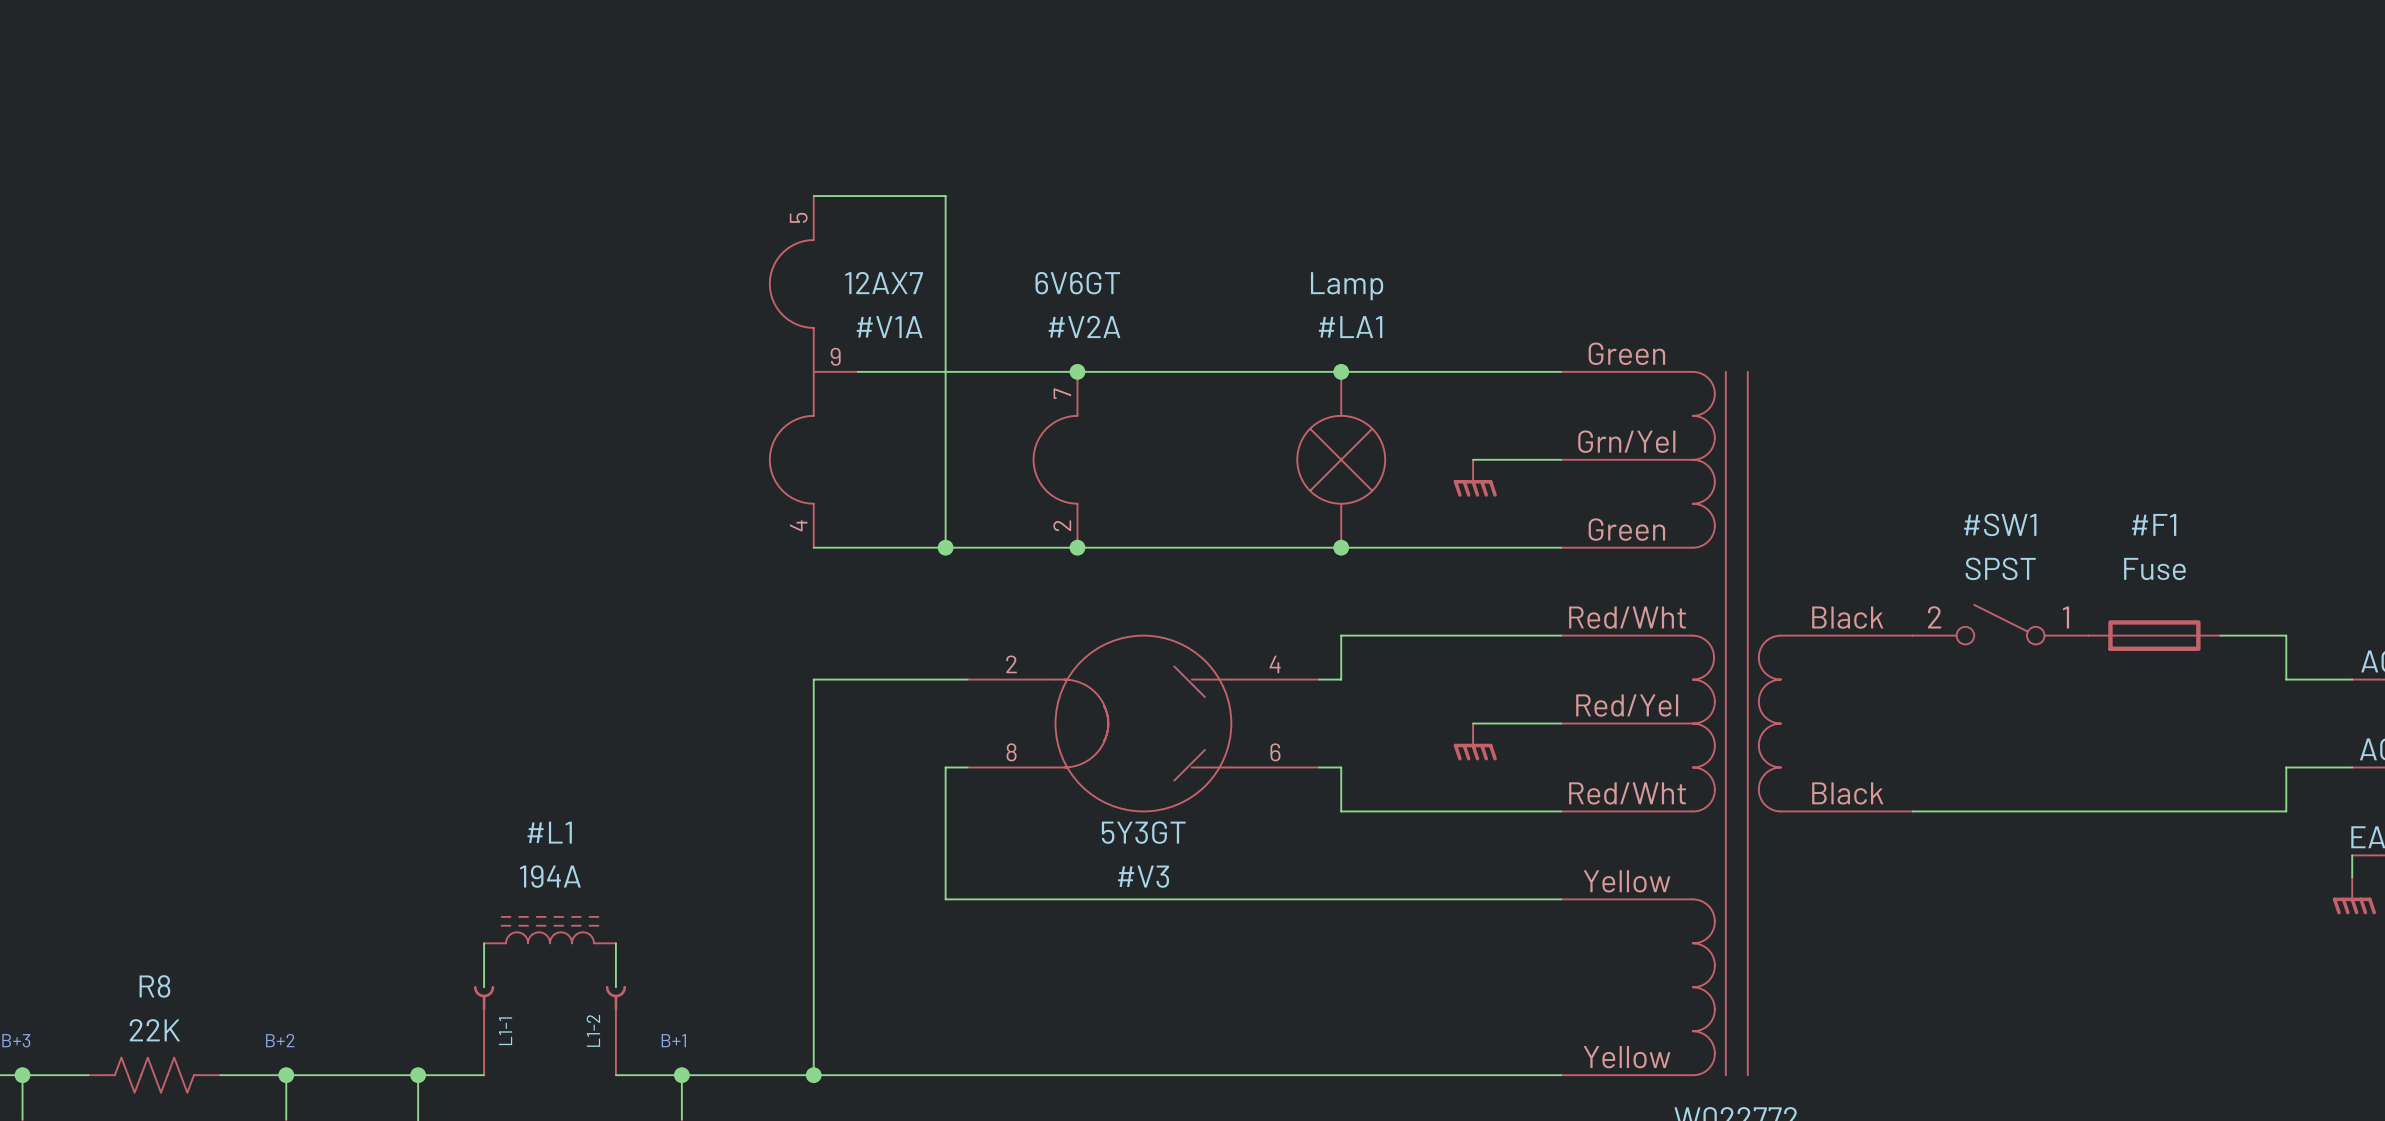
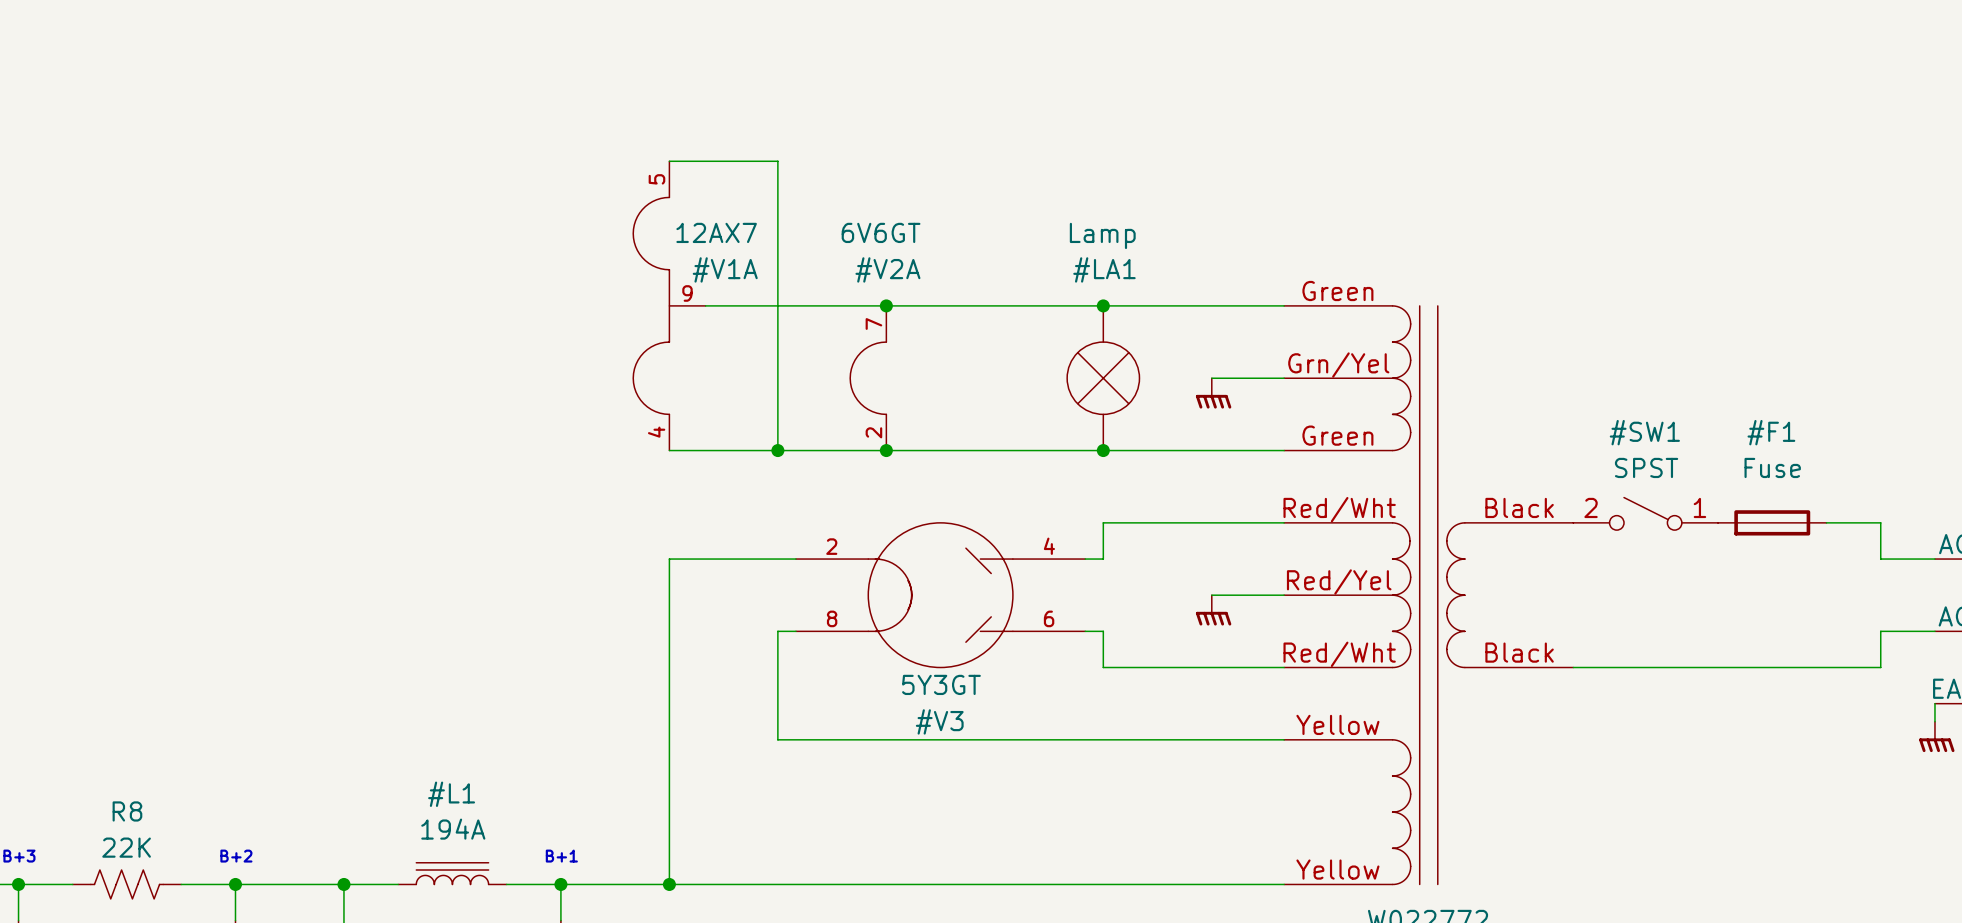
#L1 shape: [484, 916, 616, 944] -> [398, 862, 507, 885]
wire: (484, 943) (484, 987) -> none
wire: (615, 943) (615, 987) -> none
part: L1-1 (484, 1030) -> none
part: L1-2 (615, 1030) -> none

